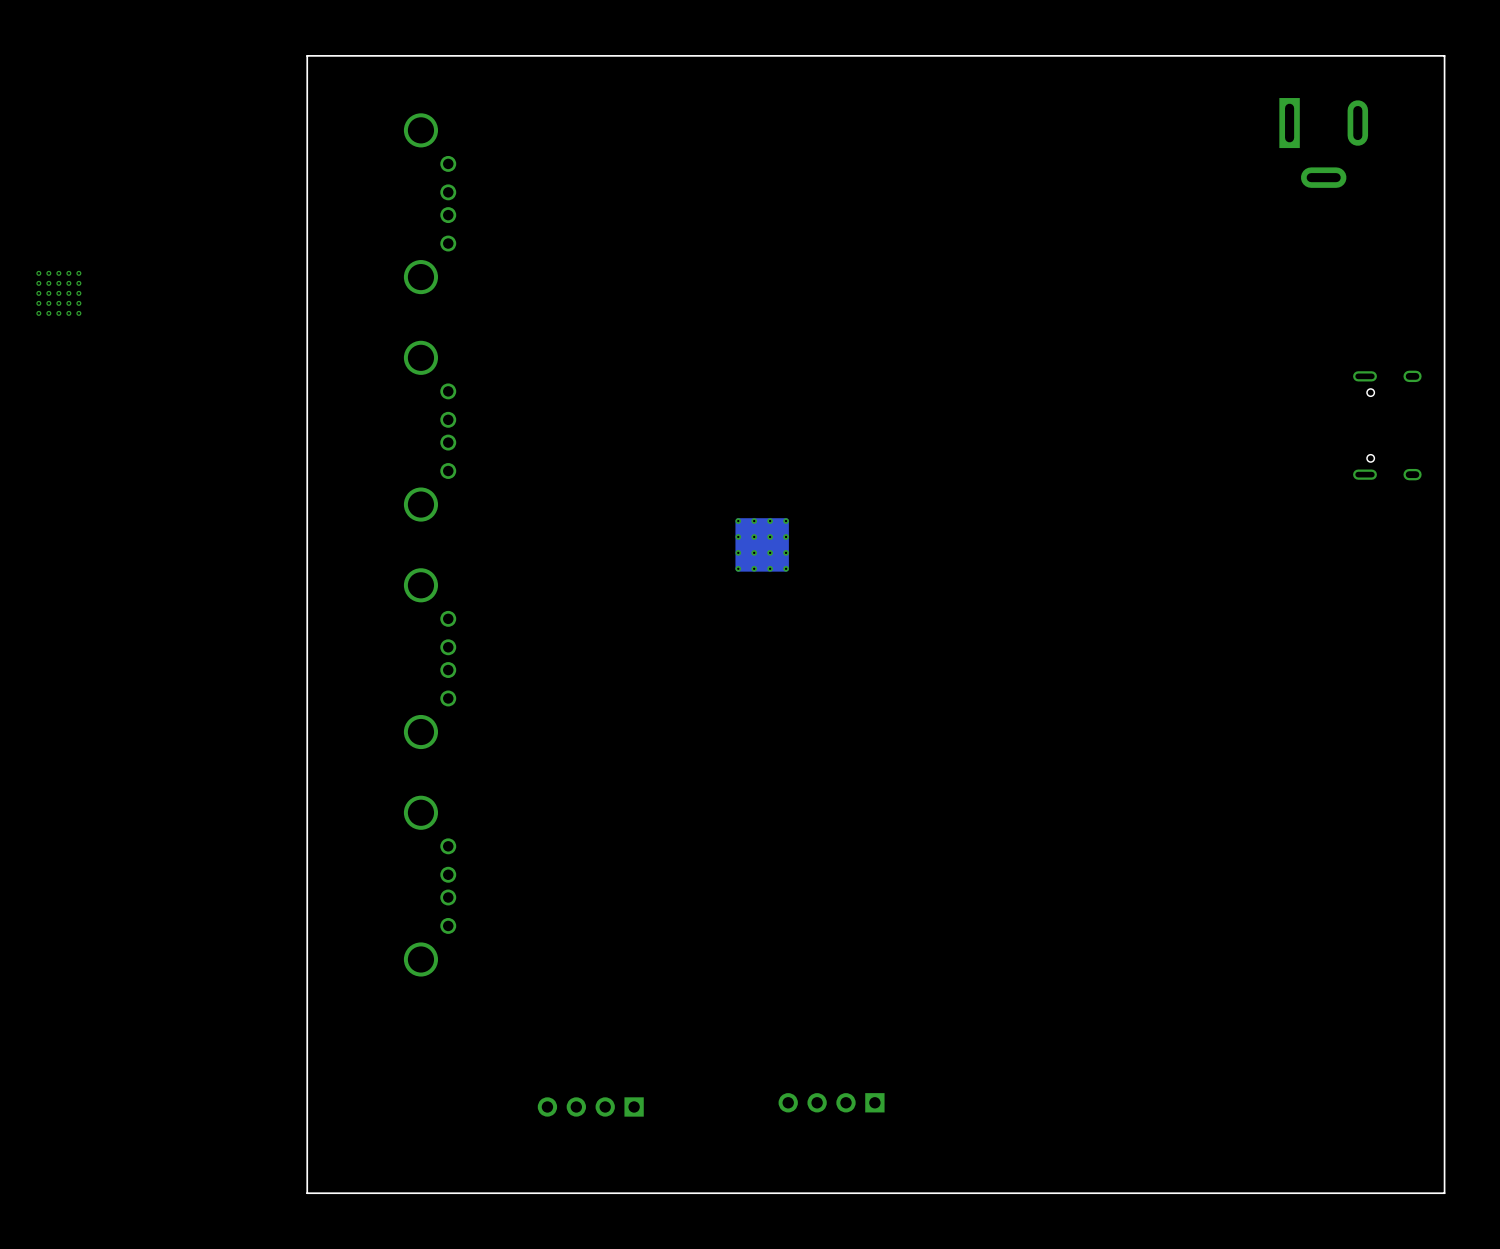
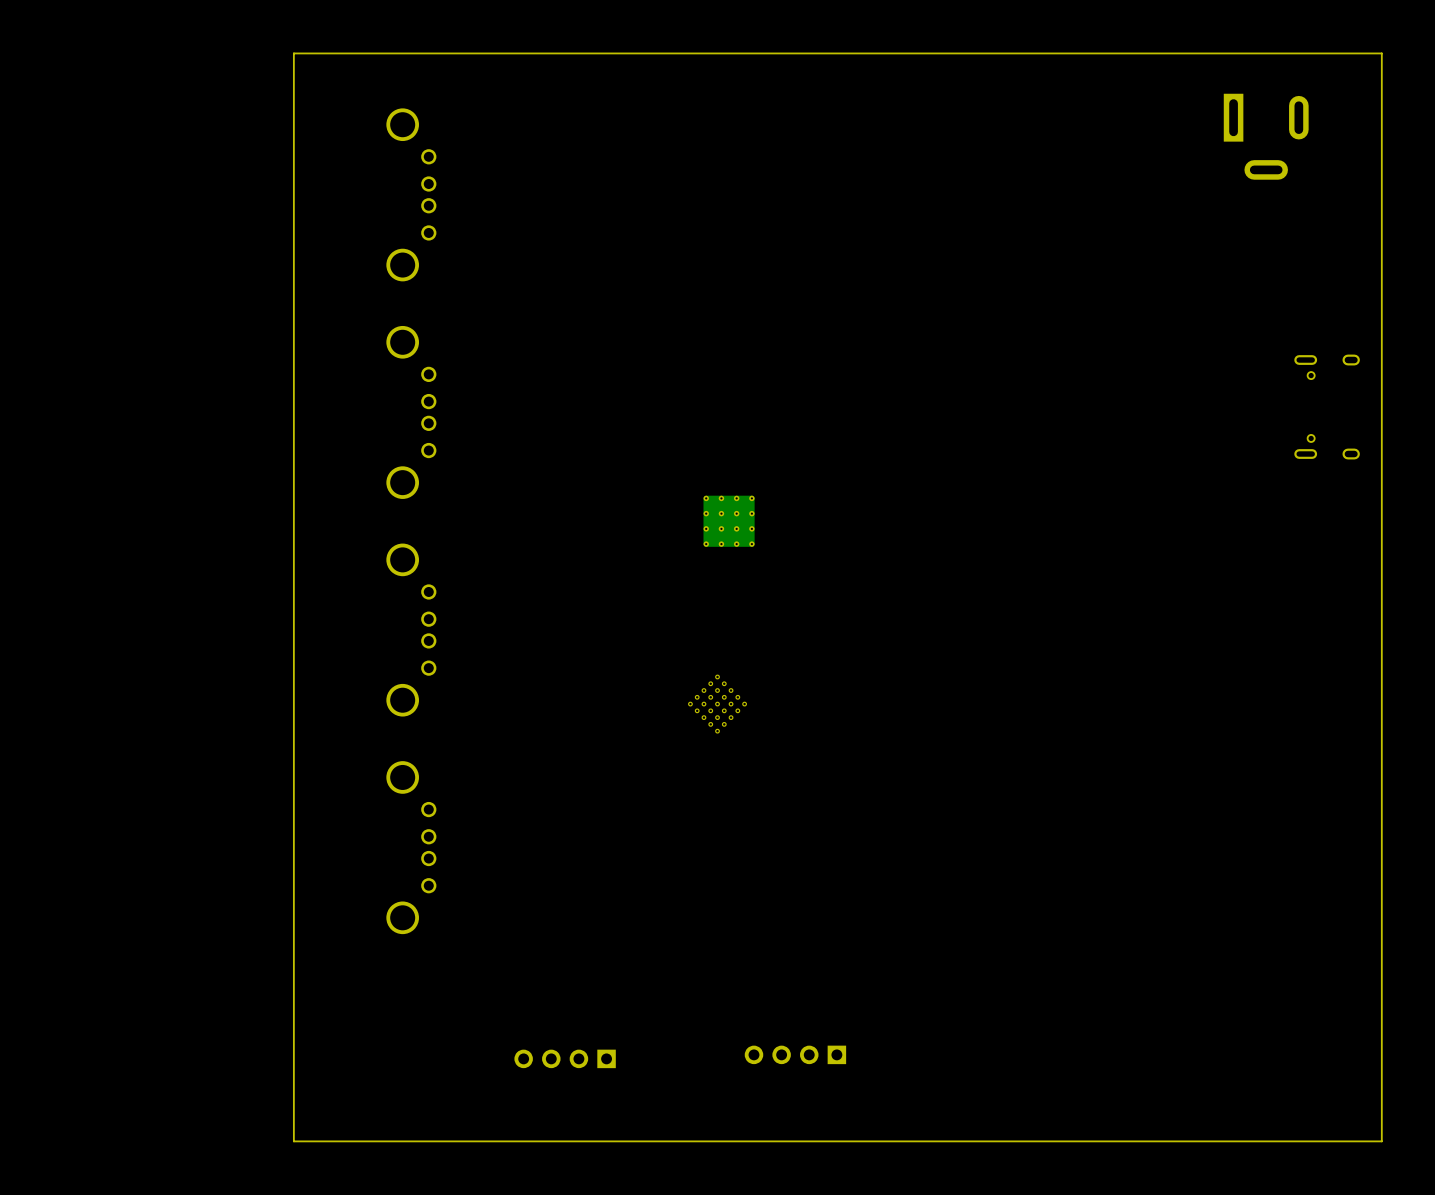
part: (58, 293) -> none
part: none -> (717, 704)

